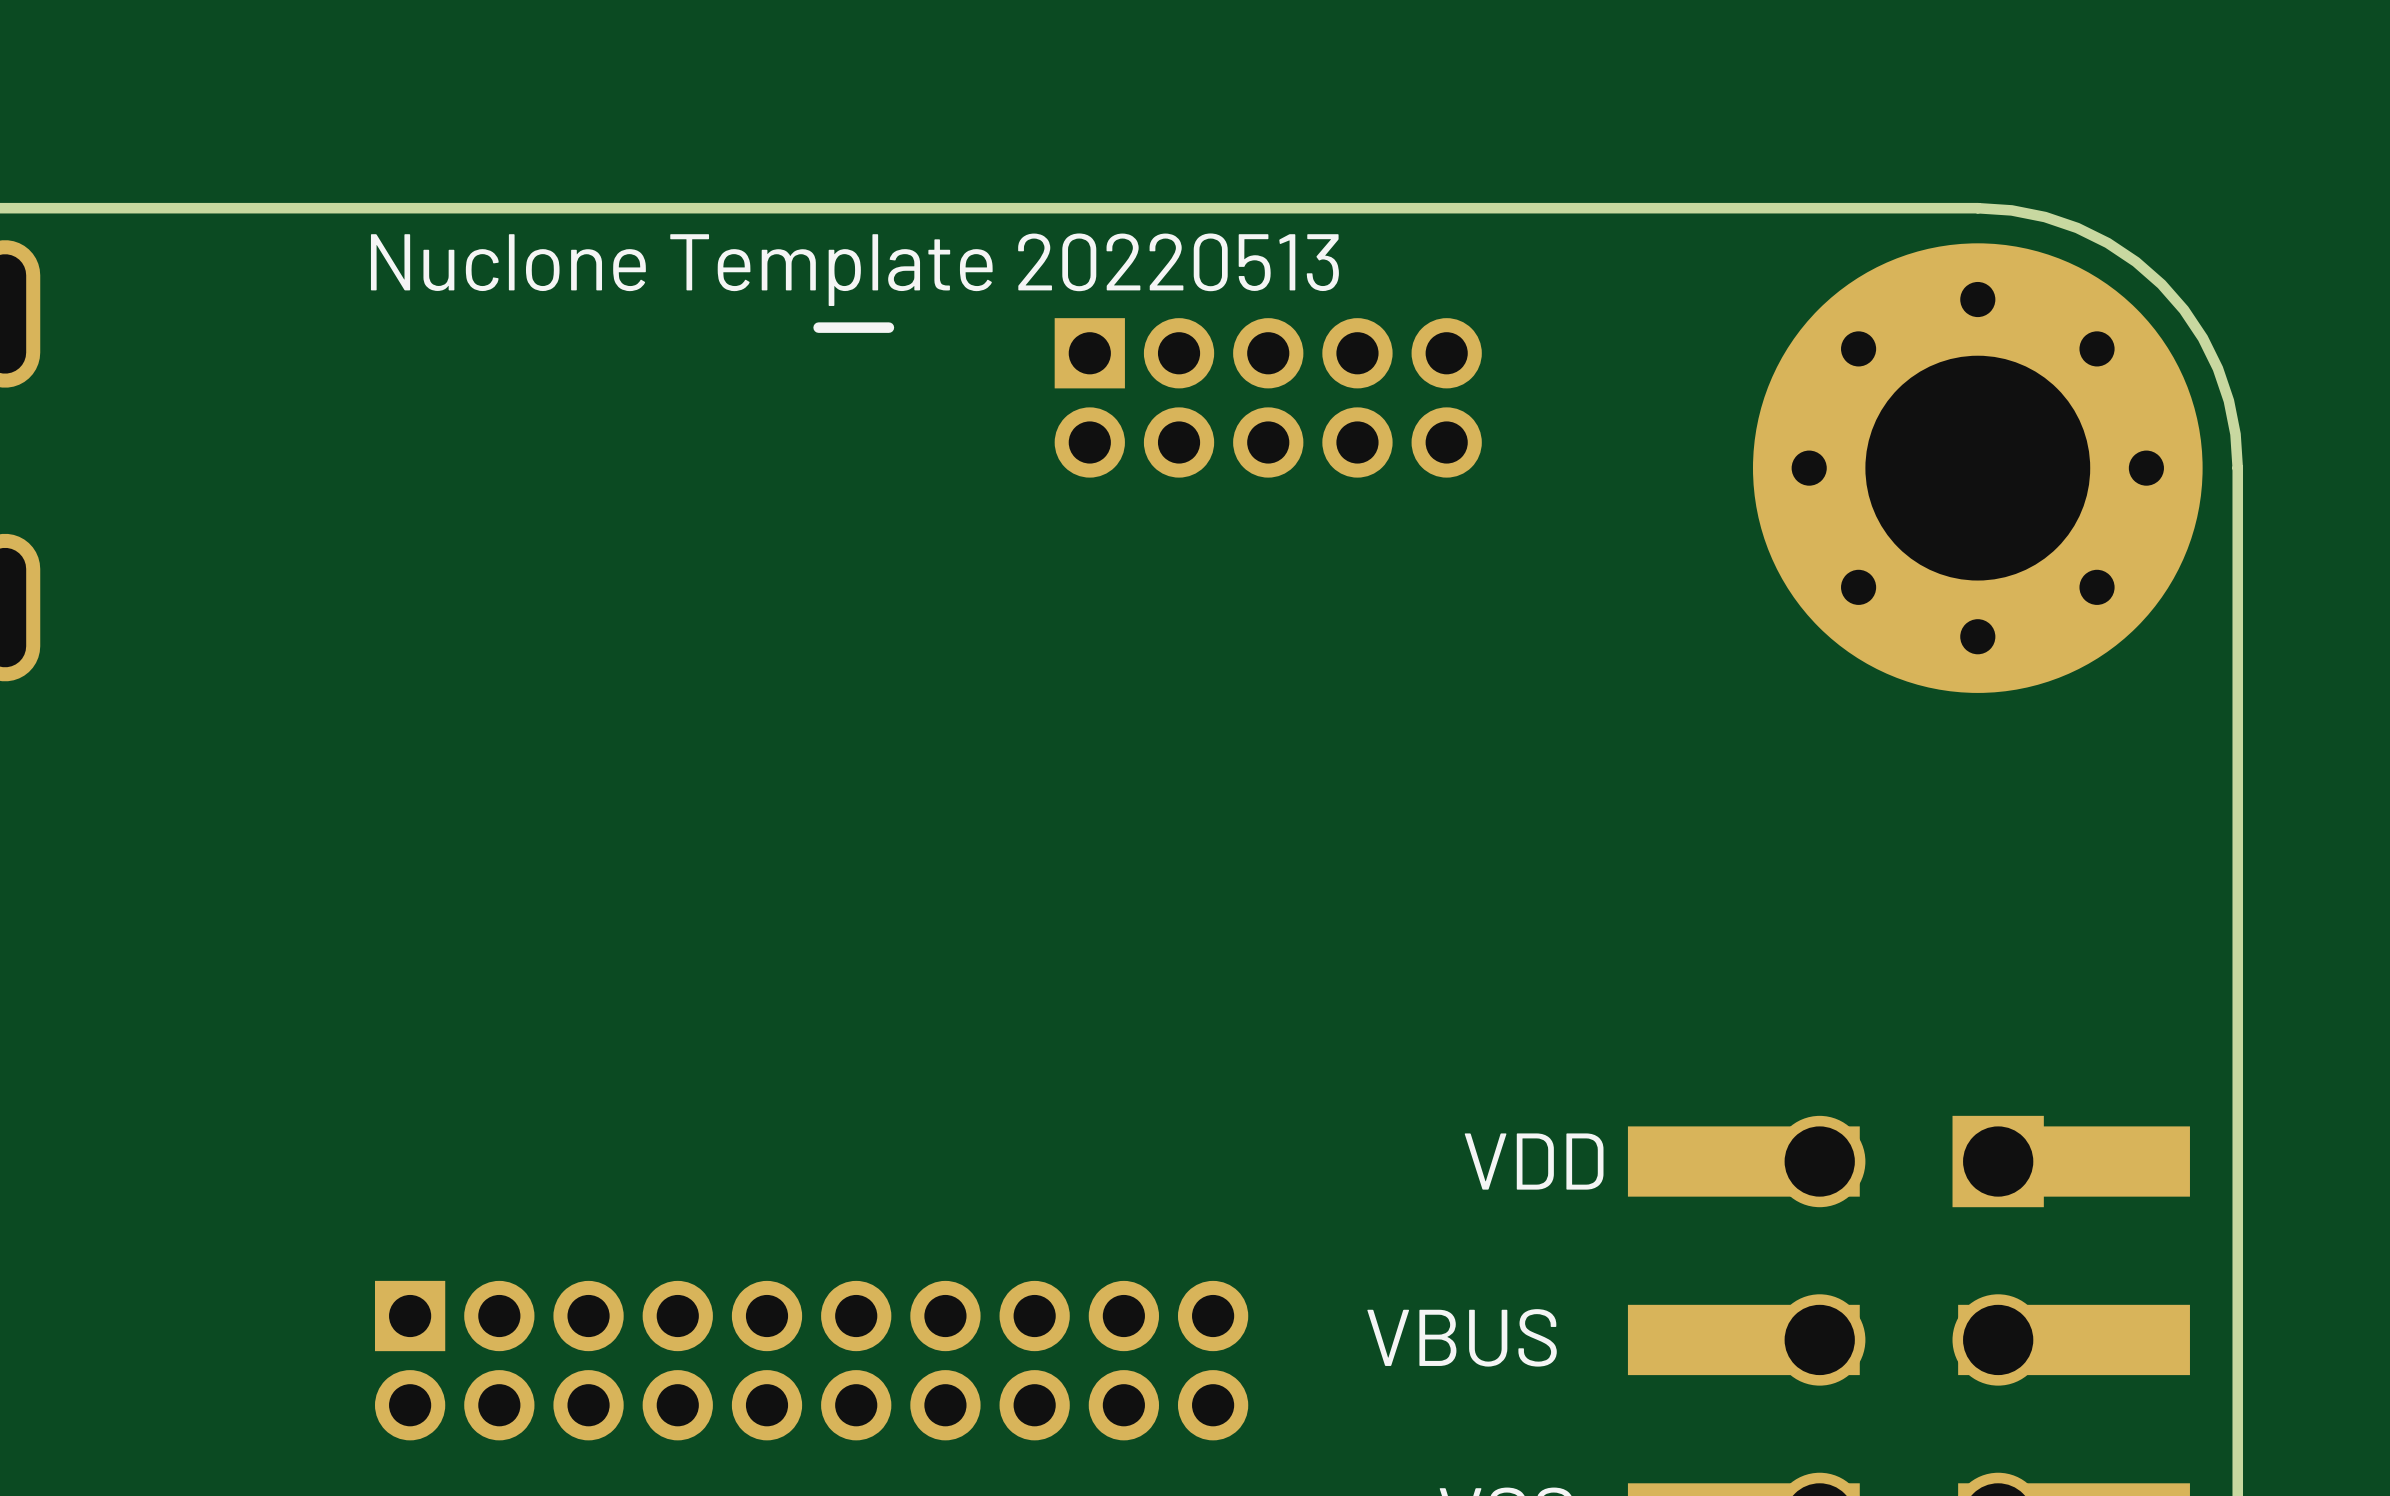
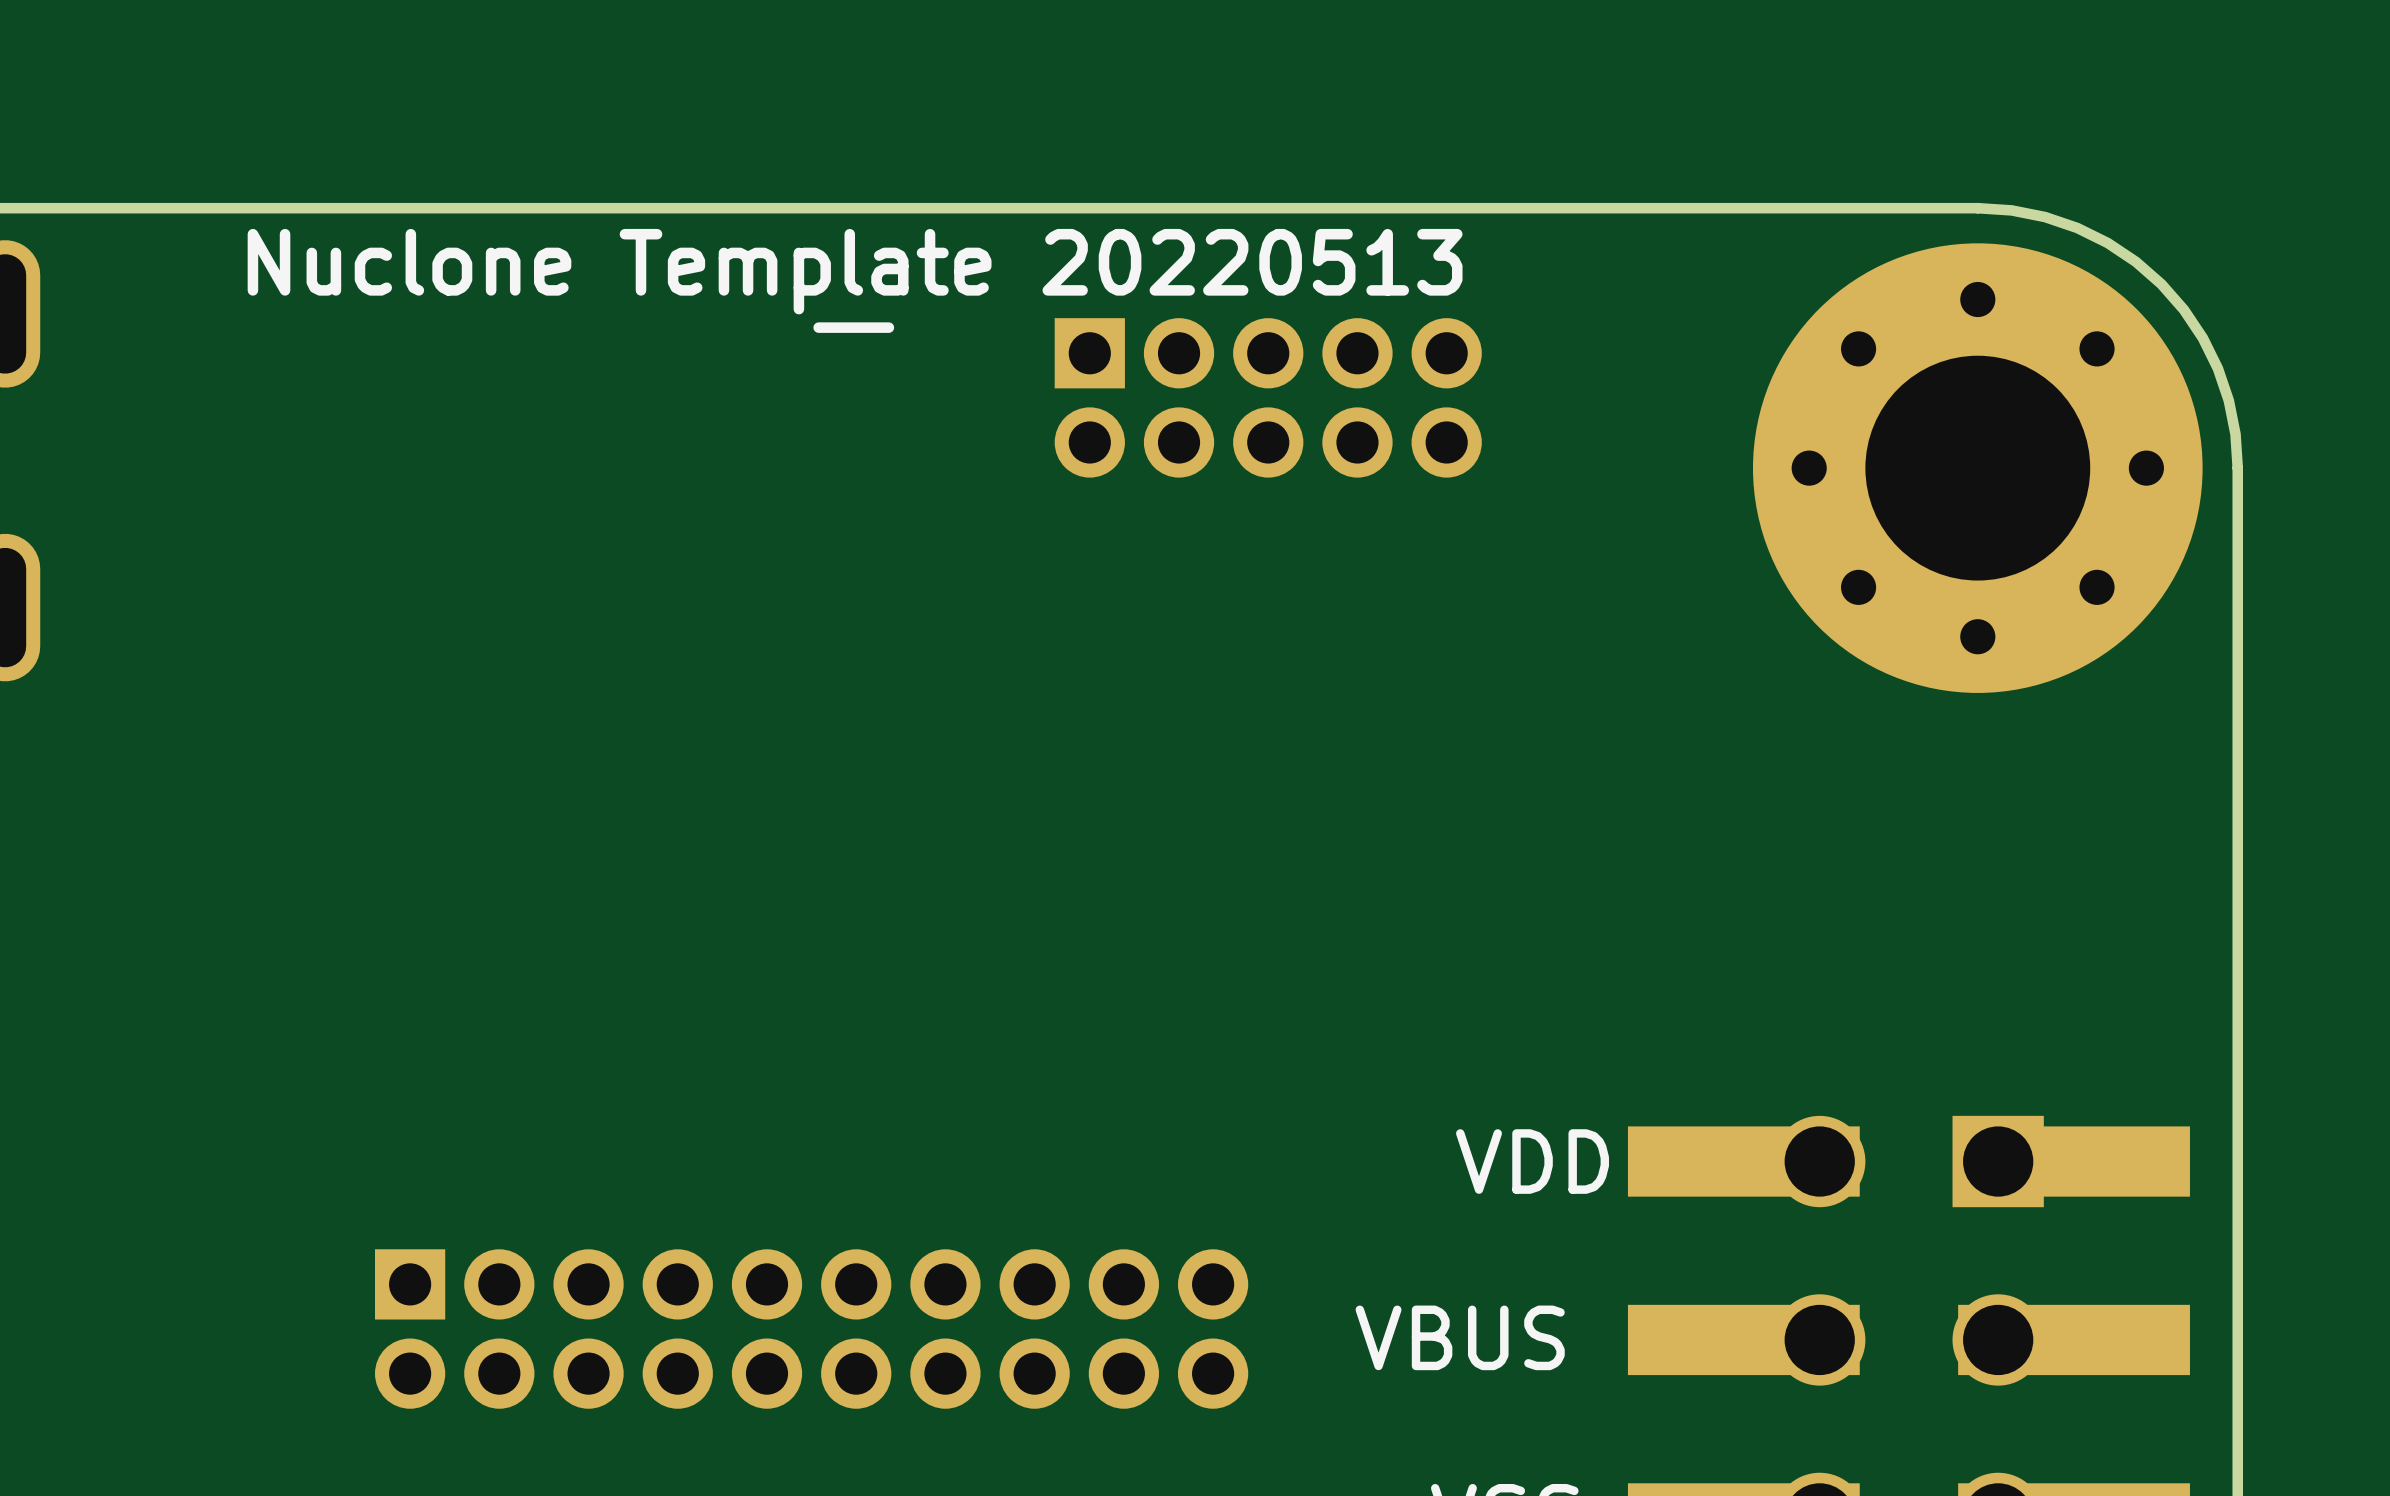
part position: (811, 1360) -> (811, 1329)

